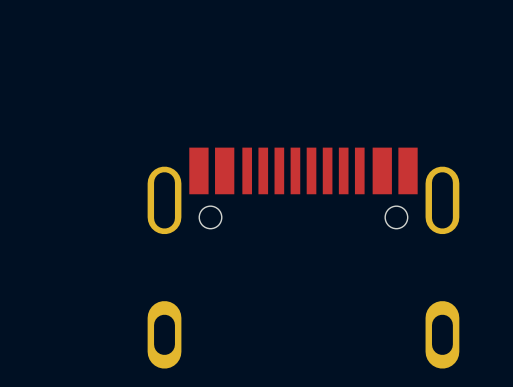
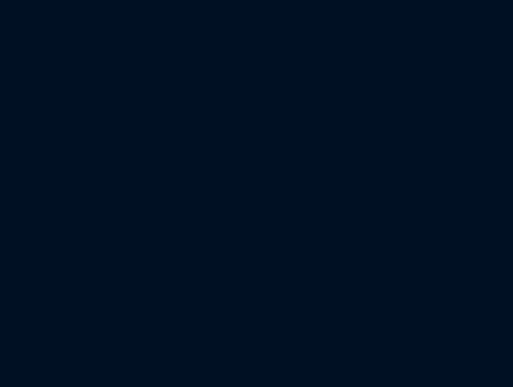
part: (303, 258) -> none

